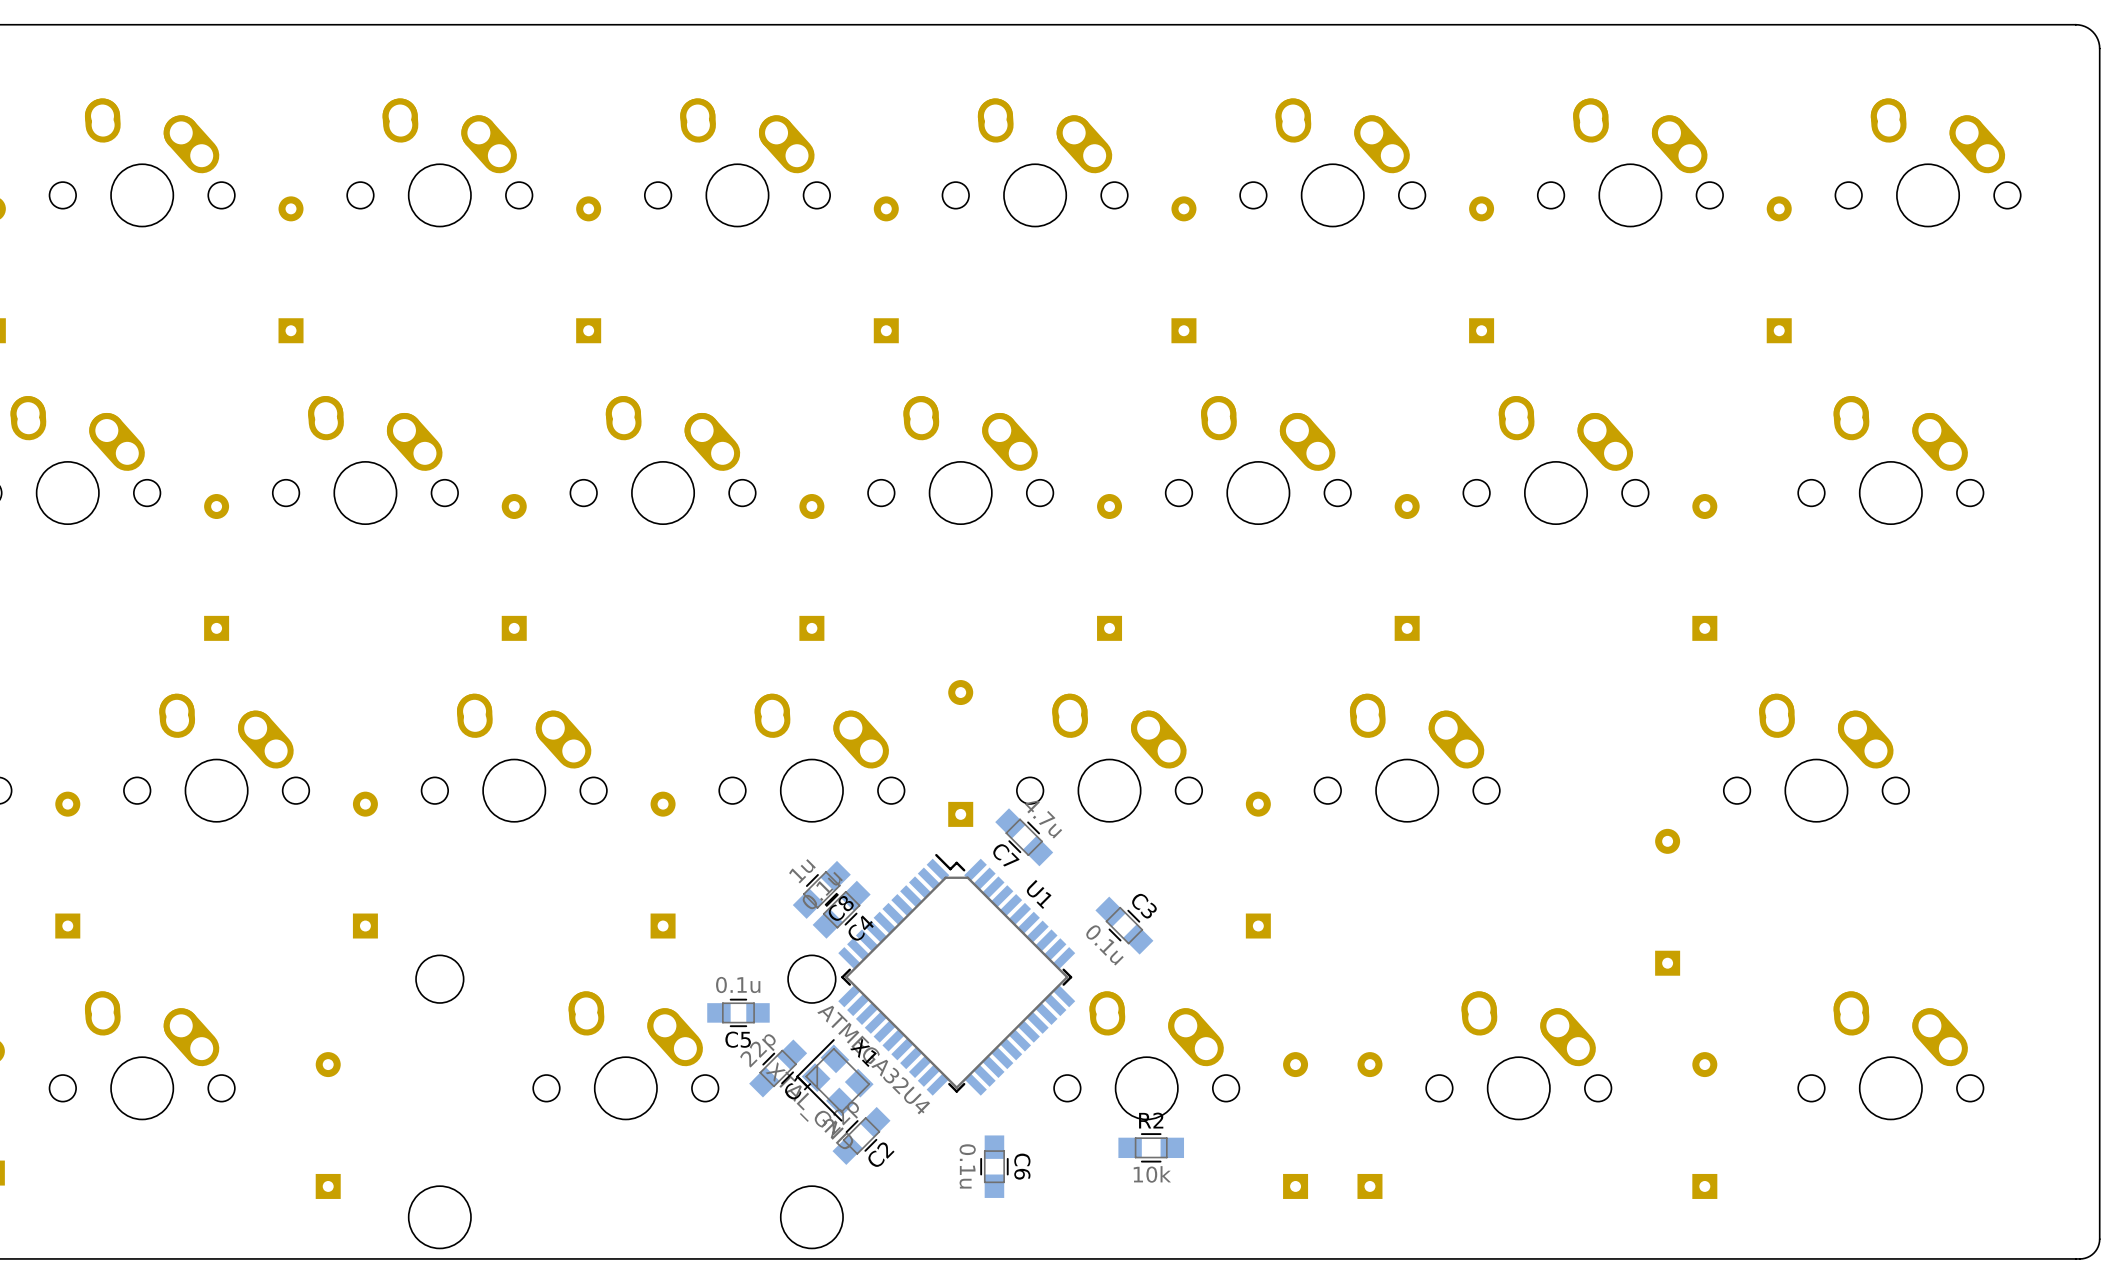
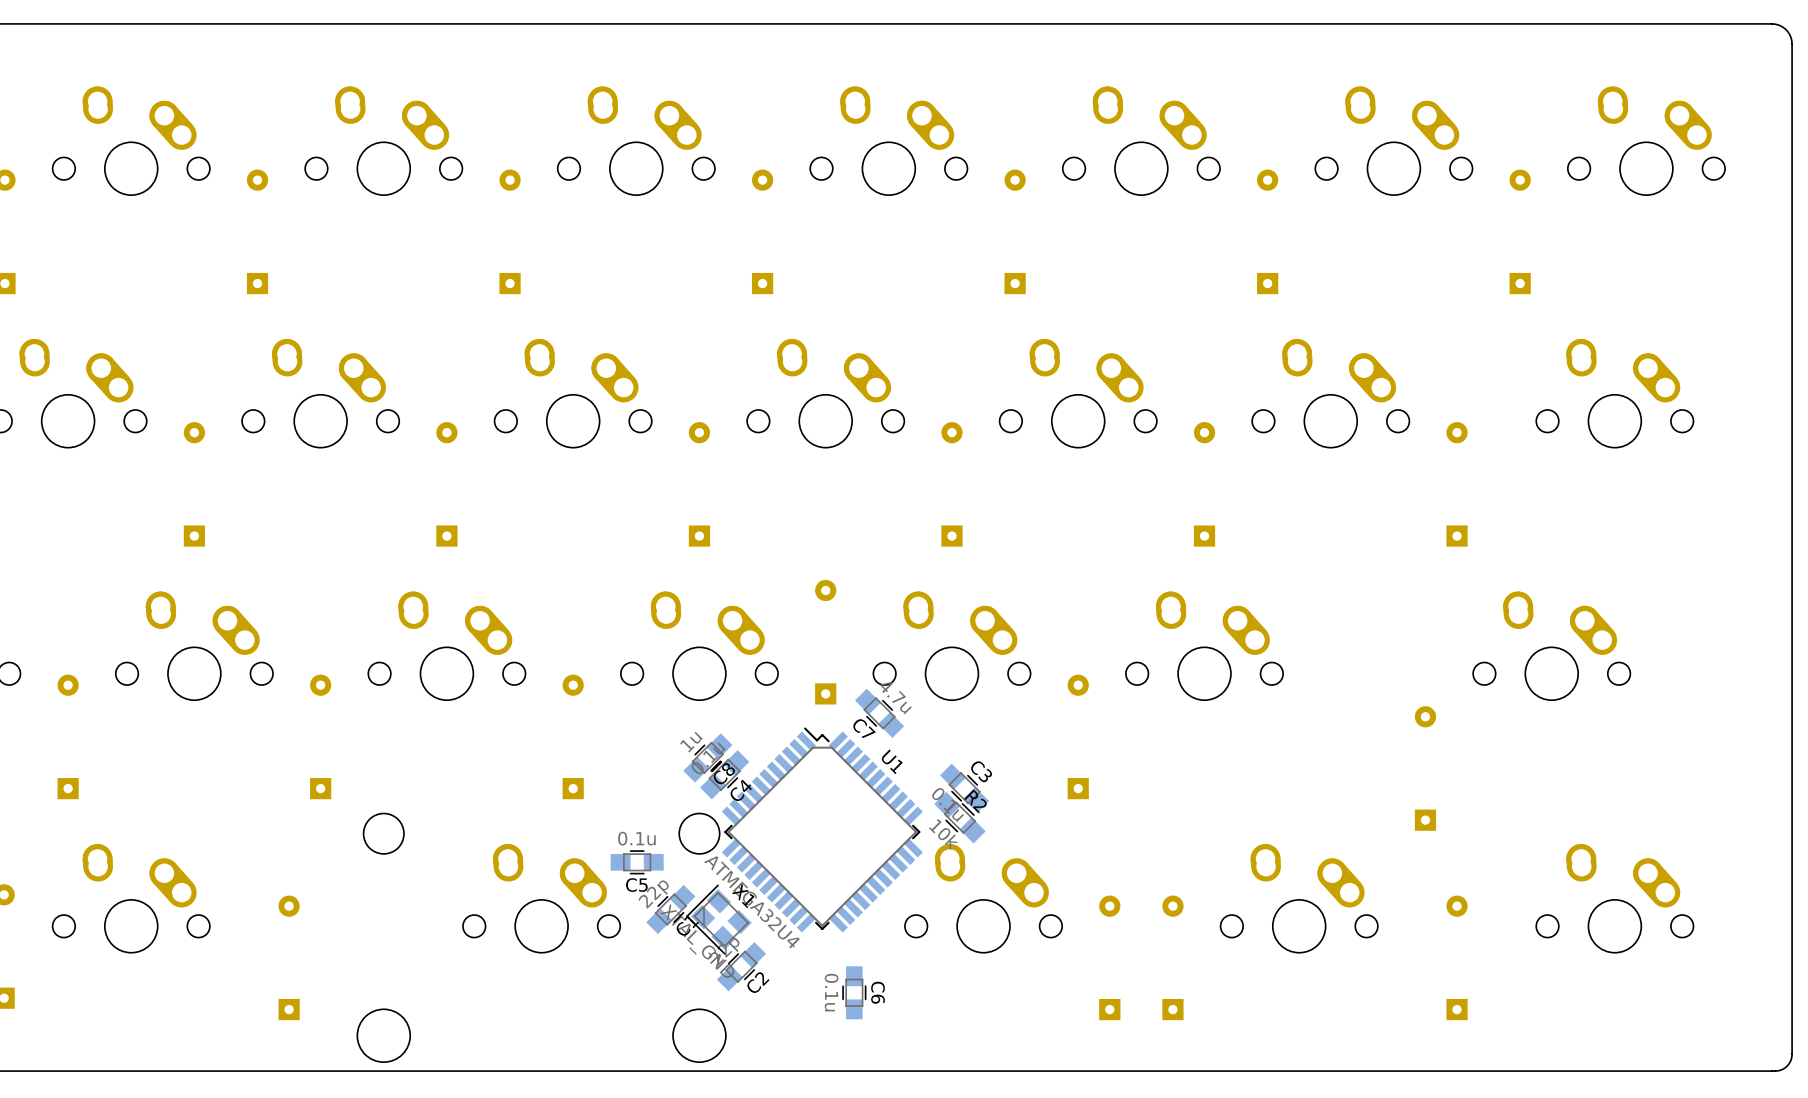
R2 rotation: 0° (1151, 1147) -> 45° clockwise (959, 817)
R2 position: (1151, 1147) -> (959, 817)

